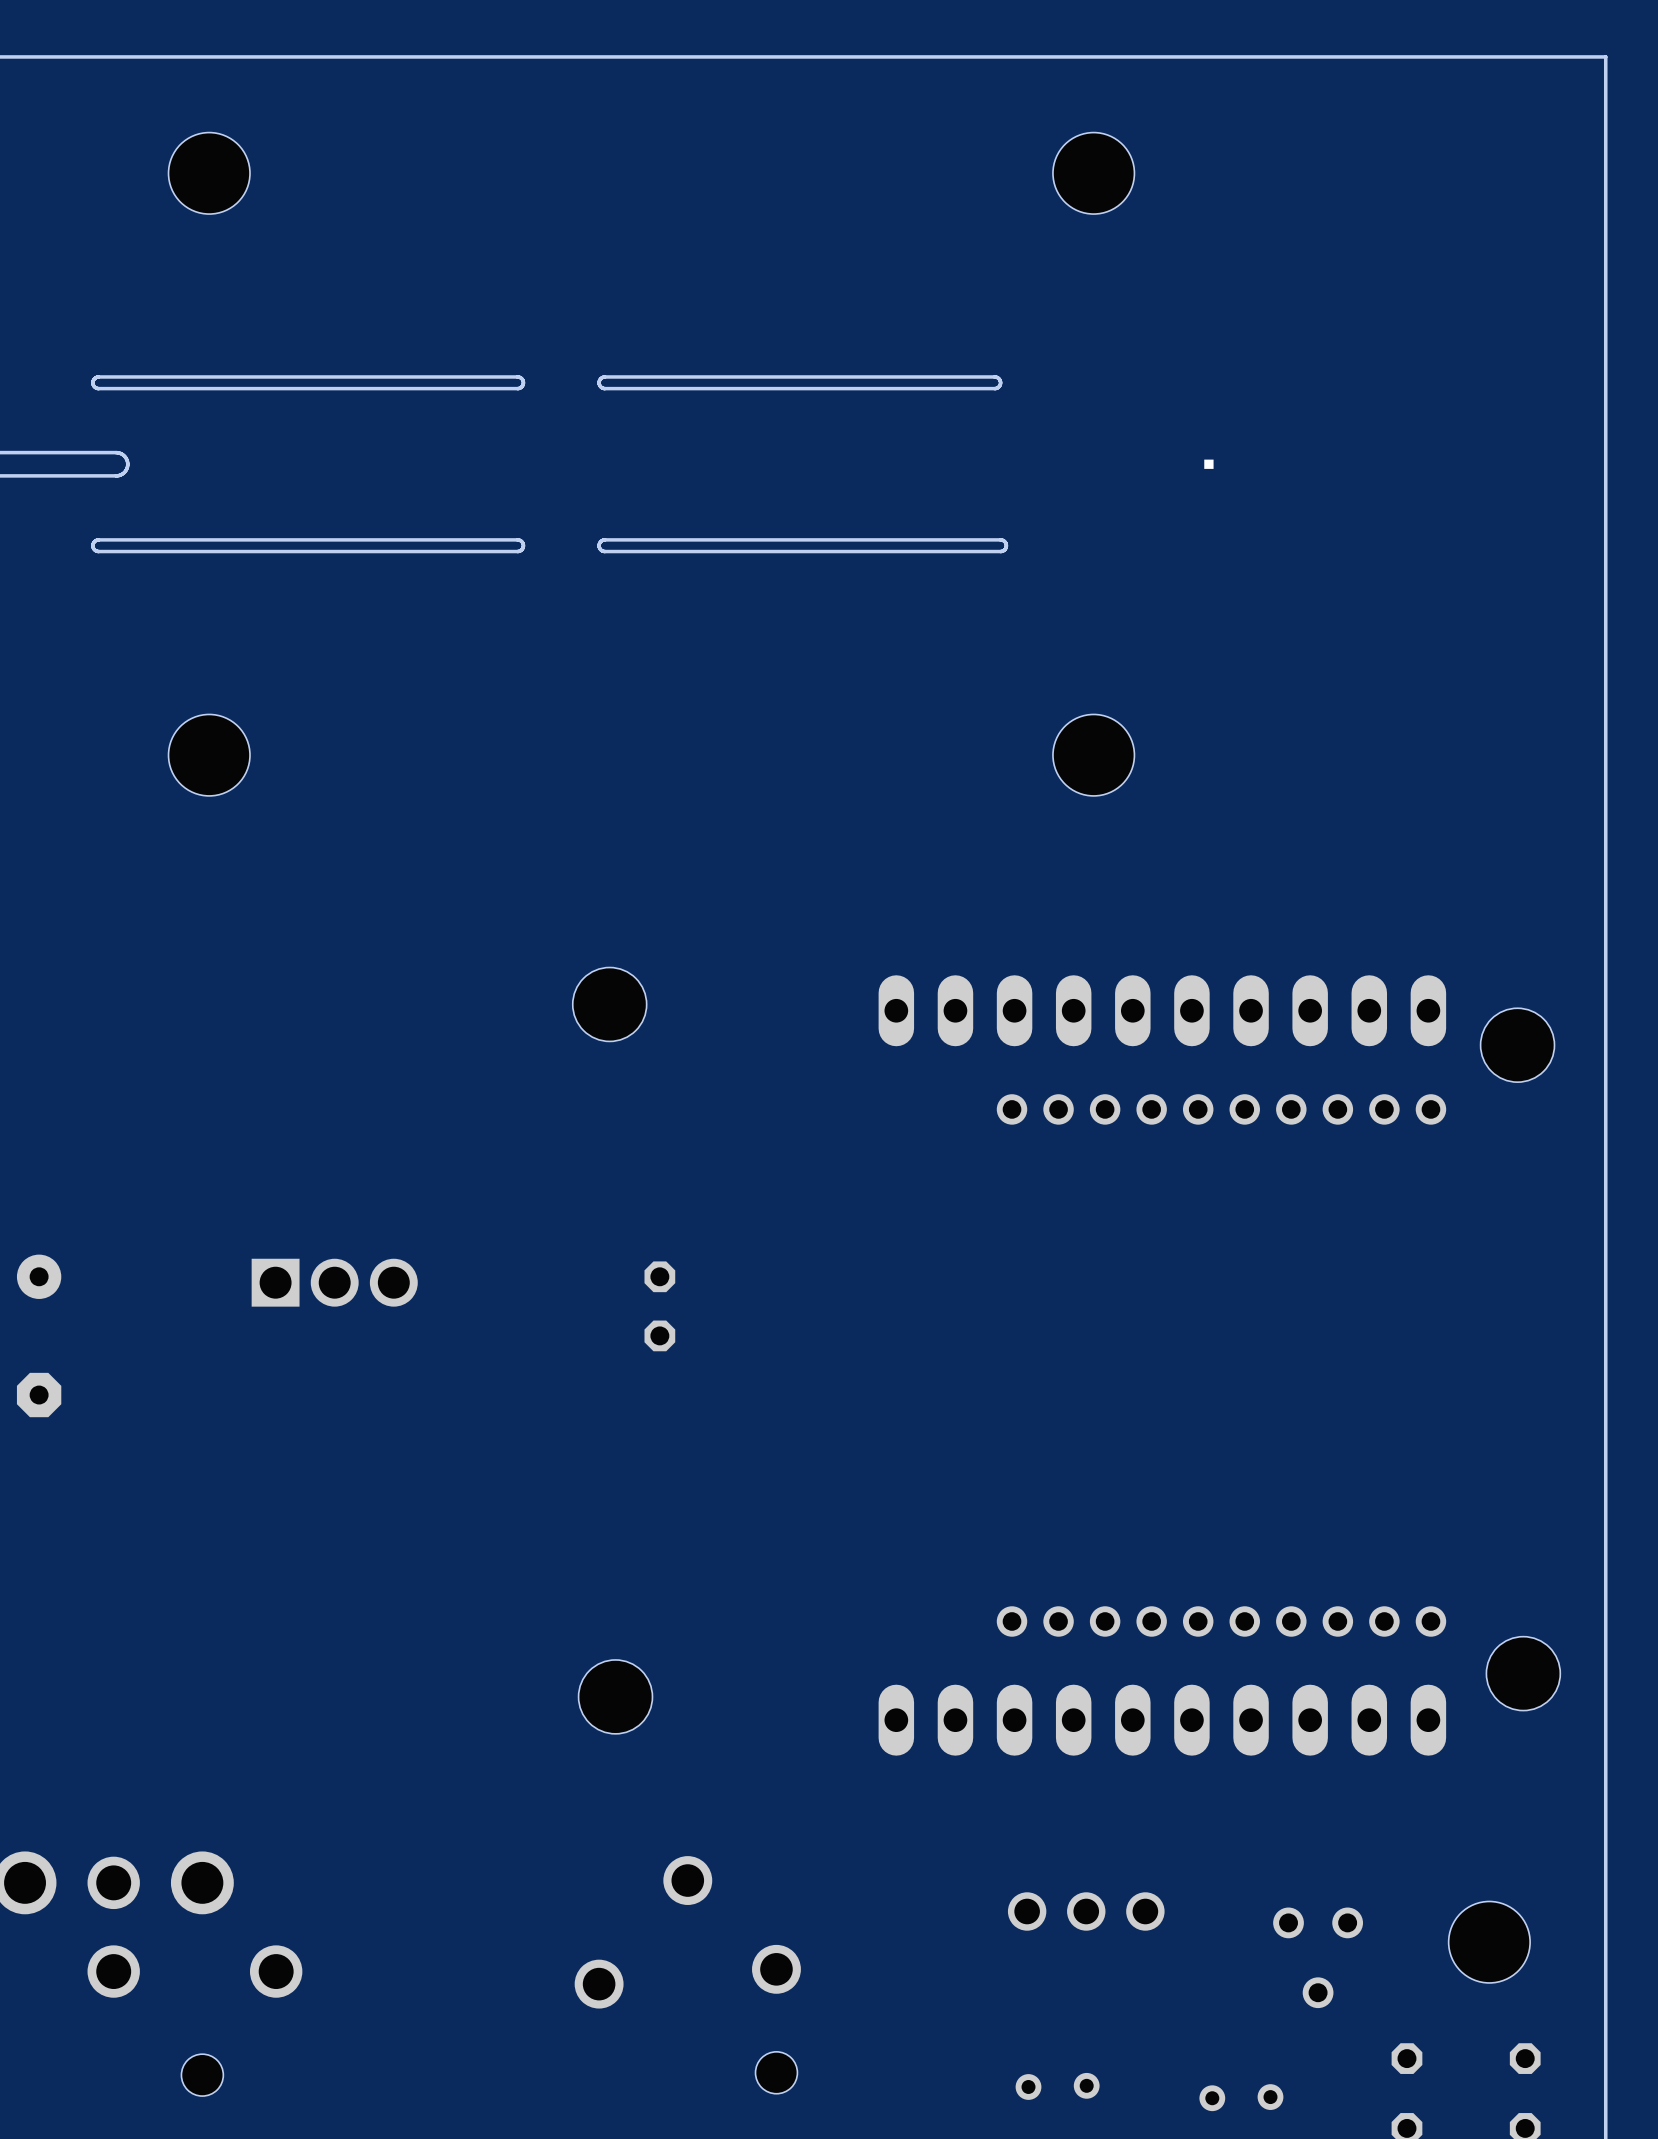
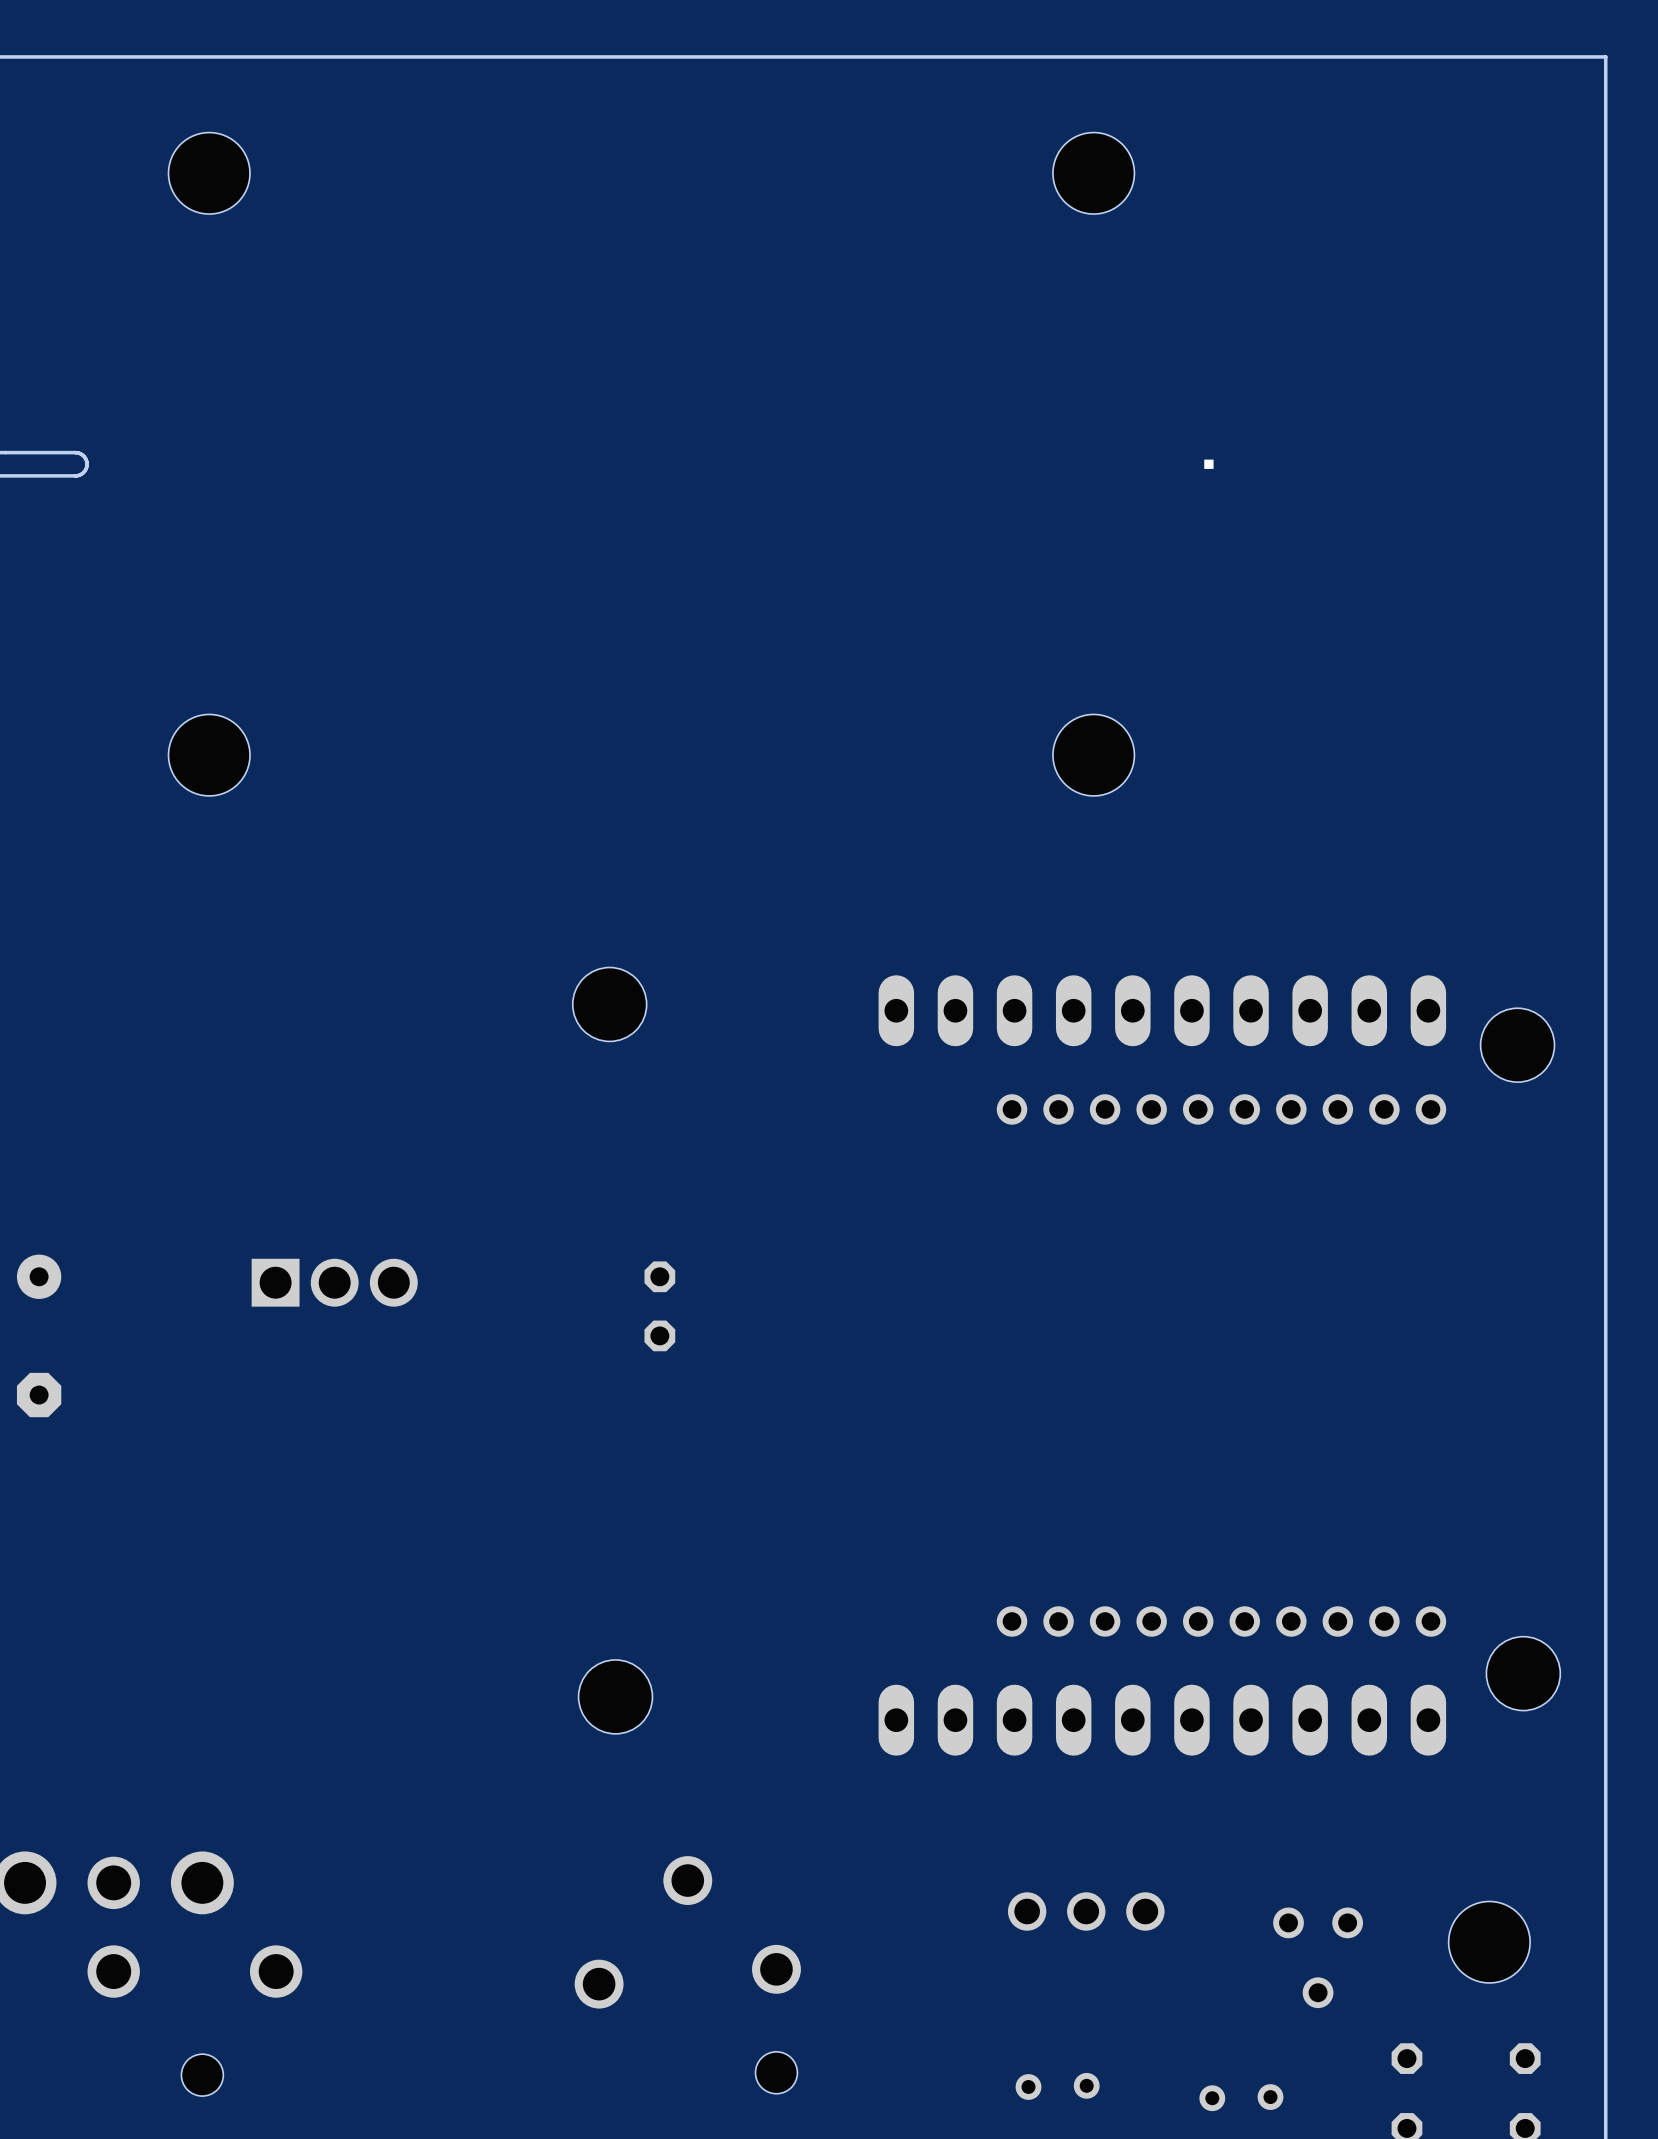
board edge: (518, 377) (522, 379) (523, 383) (517, 388) (98, 388) (94, 386) (92, 382) (94, 378) (98, 376) (518, 377) -> none
board edge: (995, 377) (604, 376) (600, 378) (599, 382) (600, 386) (604, 388) (994, 388) (1000, 383) (999, 379) (995, 377) -> none
board edge: (75, 452) (119, 453) (125, 457) (127, 464) (125, 471) (119, 475) (75, 475) -> (75, 452) (83, 456) (87, 464) (83, 472) (75, 475)
board edge: (518, 539) (522, 542) (523, 546) (517, 551) (98, 551) (94, 549) (92, 545) (94, 541) (98, 539) (518, 539) -> none
board edge: (1001, 539) (604, 539) (600, 541) (599, 545) (600, 549) (604, 551) (1000, 551) (1006, 546) (1005, 542) (1001, 539) -> none

